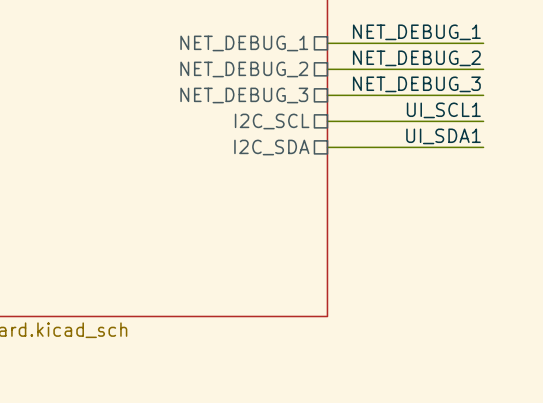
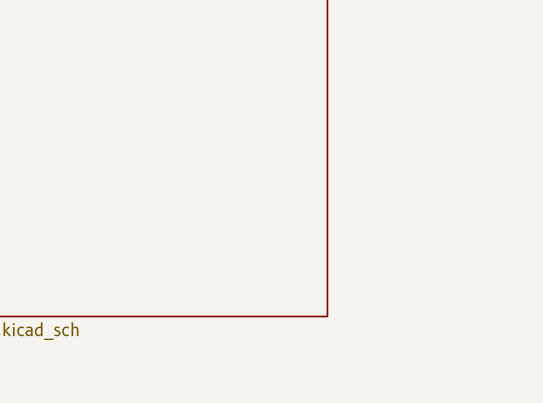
label: NET_DEBUG_1 (416, 32) -> none
sheet pin: NET_DEBUG_1 (244, 43) -> none
wire: (327, 43) (483, 43) -> none
label: NET_DEBUG_2 (416, 58) -> none
sheet pin: NET_DEBUG_2 (244, 69) -> none
wire: (327, 69) (483, 69) -> none
label: NET_DEBUG_3 (416, 84) -> none
sheet pin: NET_DEBUG_3 (244, 95) -> none
wire: (327, 95) (483, 95) -> none
label: UI_SCL1 (443, 110) -> none
sheet pin: I2C_SCL (272, 121) -> none
wire: (327, 121) (483, 121) -> none
label: UI_SDA1 (443, 136) -> none
sheet pin: I2C_SDA (271, 147) -> none
wire: (327, 147) (483, 147) -> none

